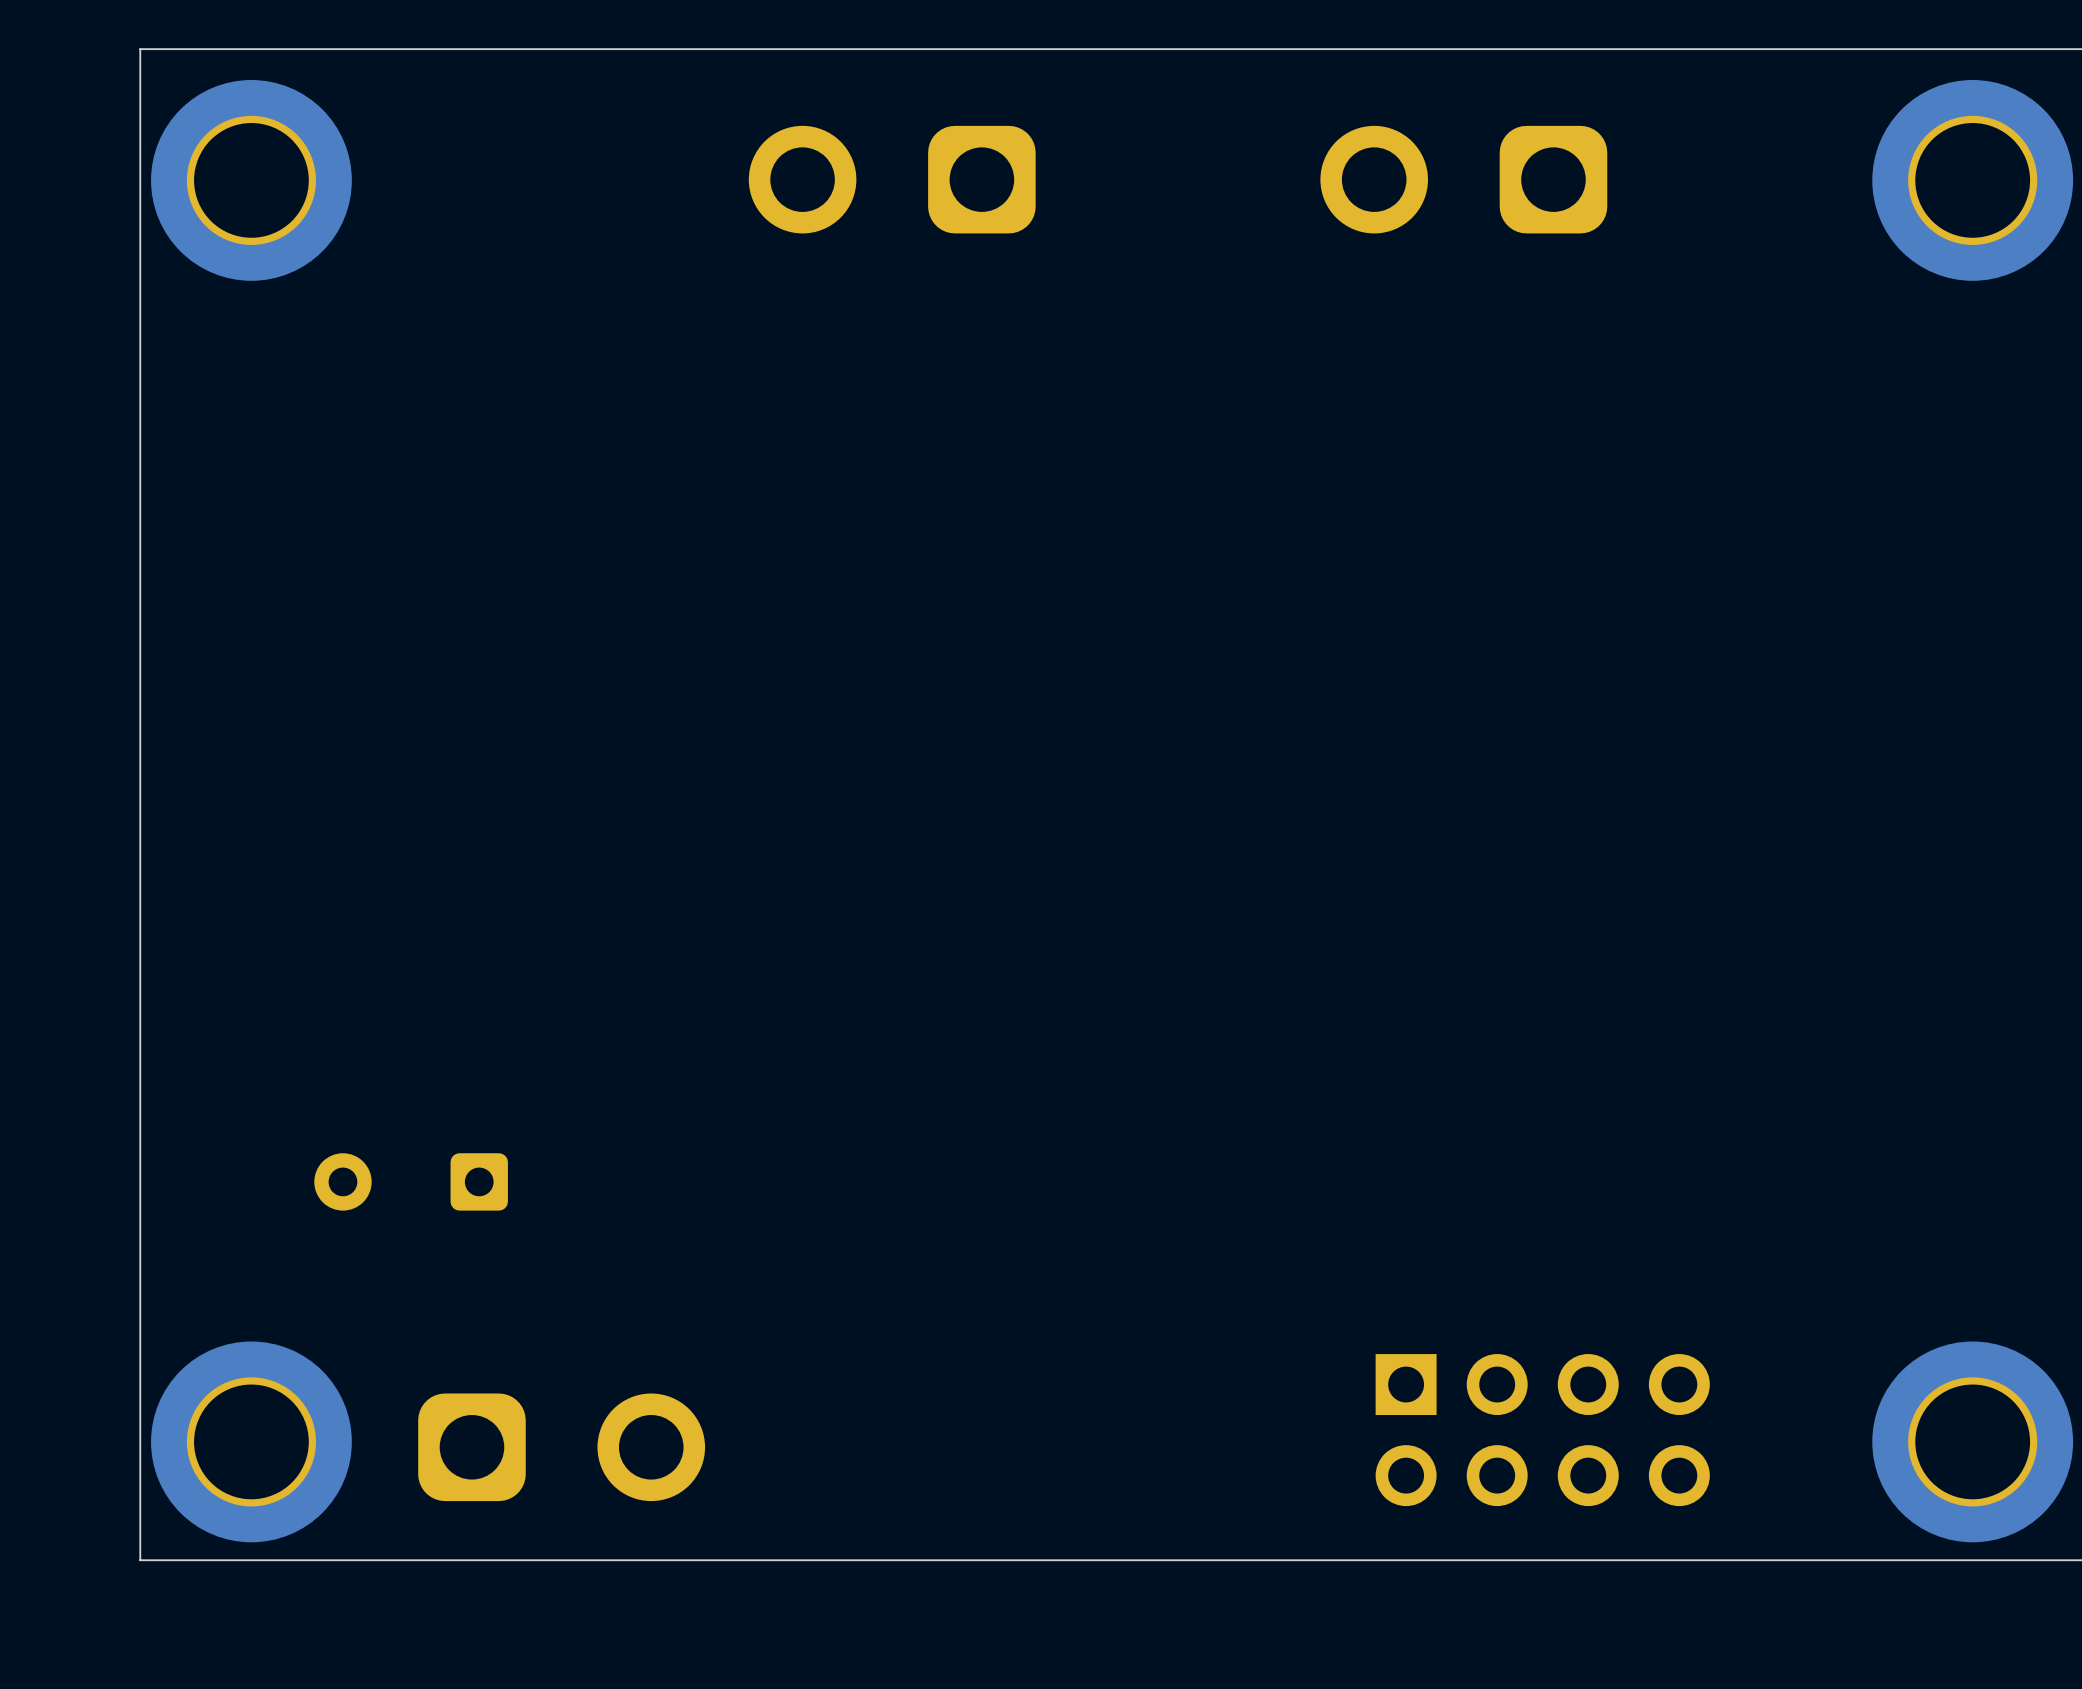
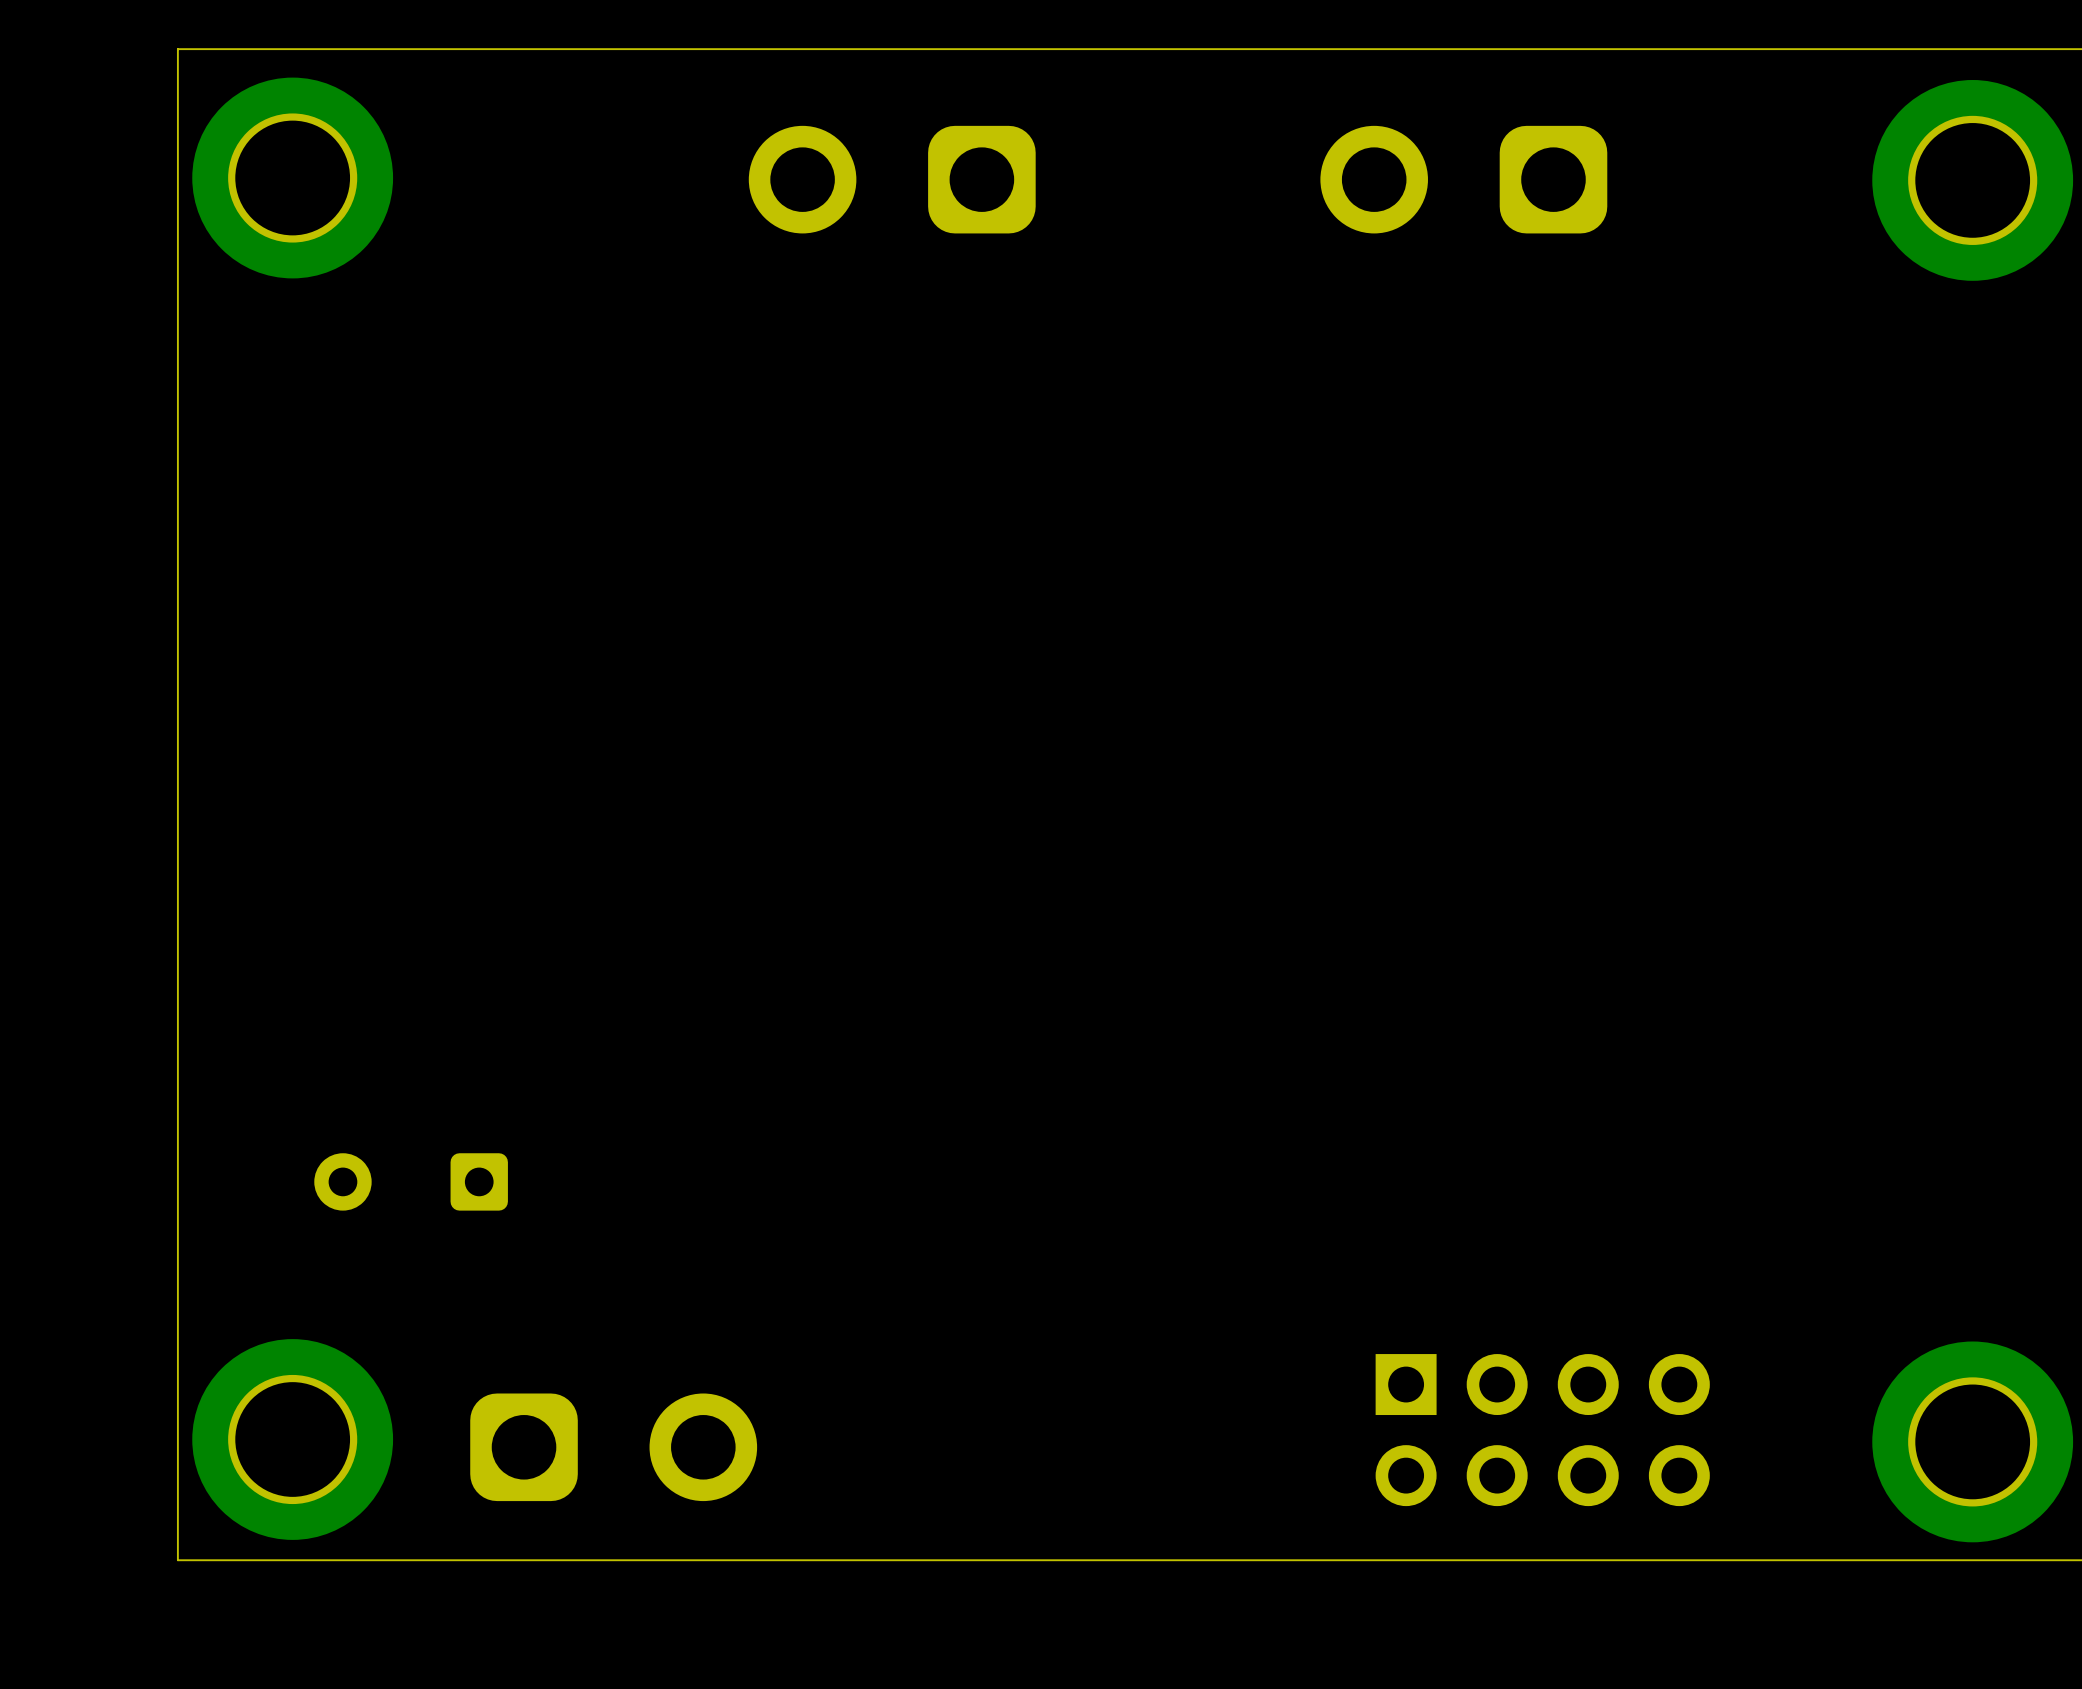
board edge: (177, 49) (140, 49) (140, 1560) (177, 1560) -> (177, 49) (177, 1560)
part position: (251, 180) -> (292, 178)
part position: (251, 1441) -> (292, 1439)
part position: (561, 1447) -> (613, 1447)

